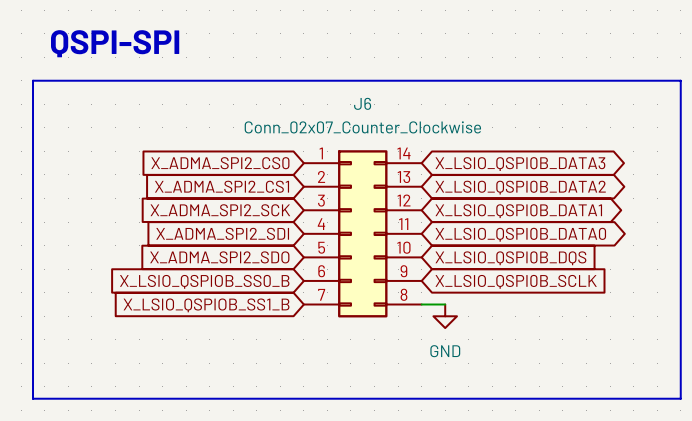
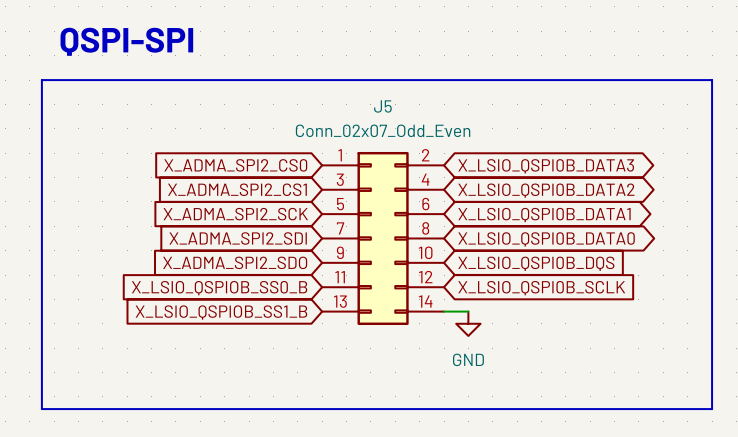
J6 name: J6 (362, 103) -> J5 (382, 106)
J6 value: Conn_02x07_Counter_Clockwise (362, 127) -> Conn_02x07_Odd_Even (383, 130)
J6 symbol: [303, 150, 422, 318] -> [322, 151, 445, 325]

